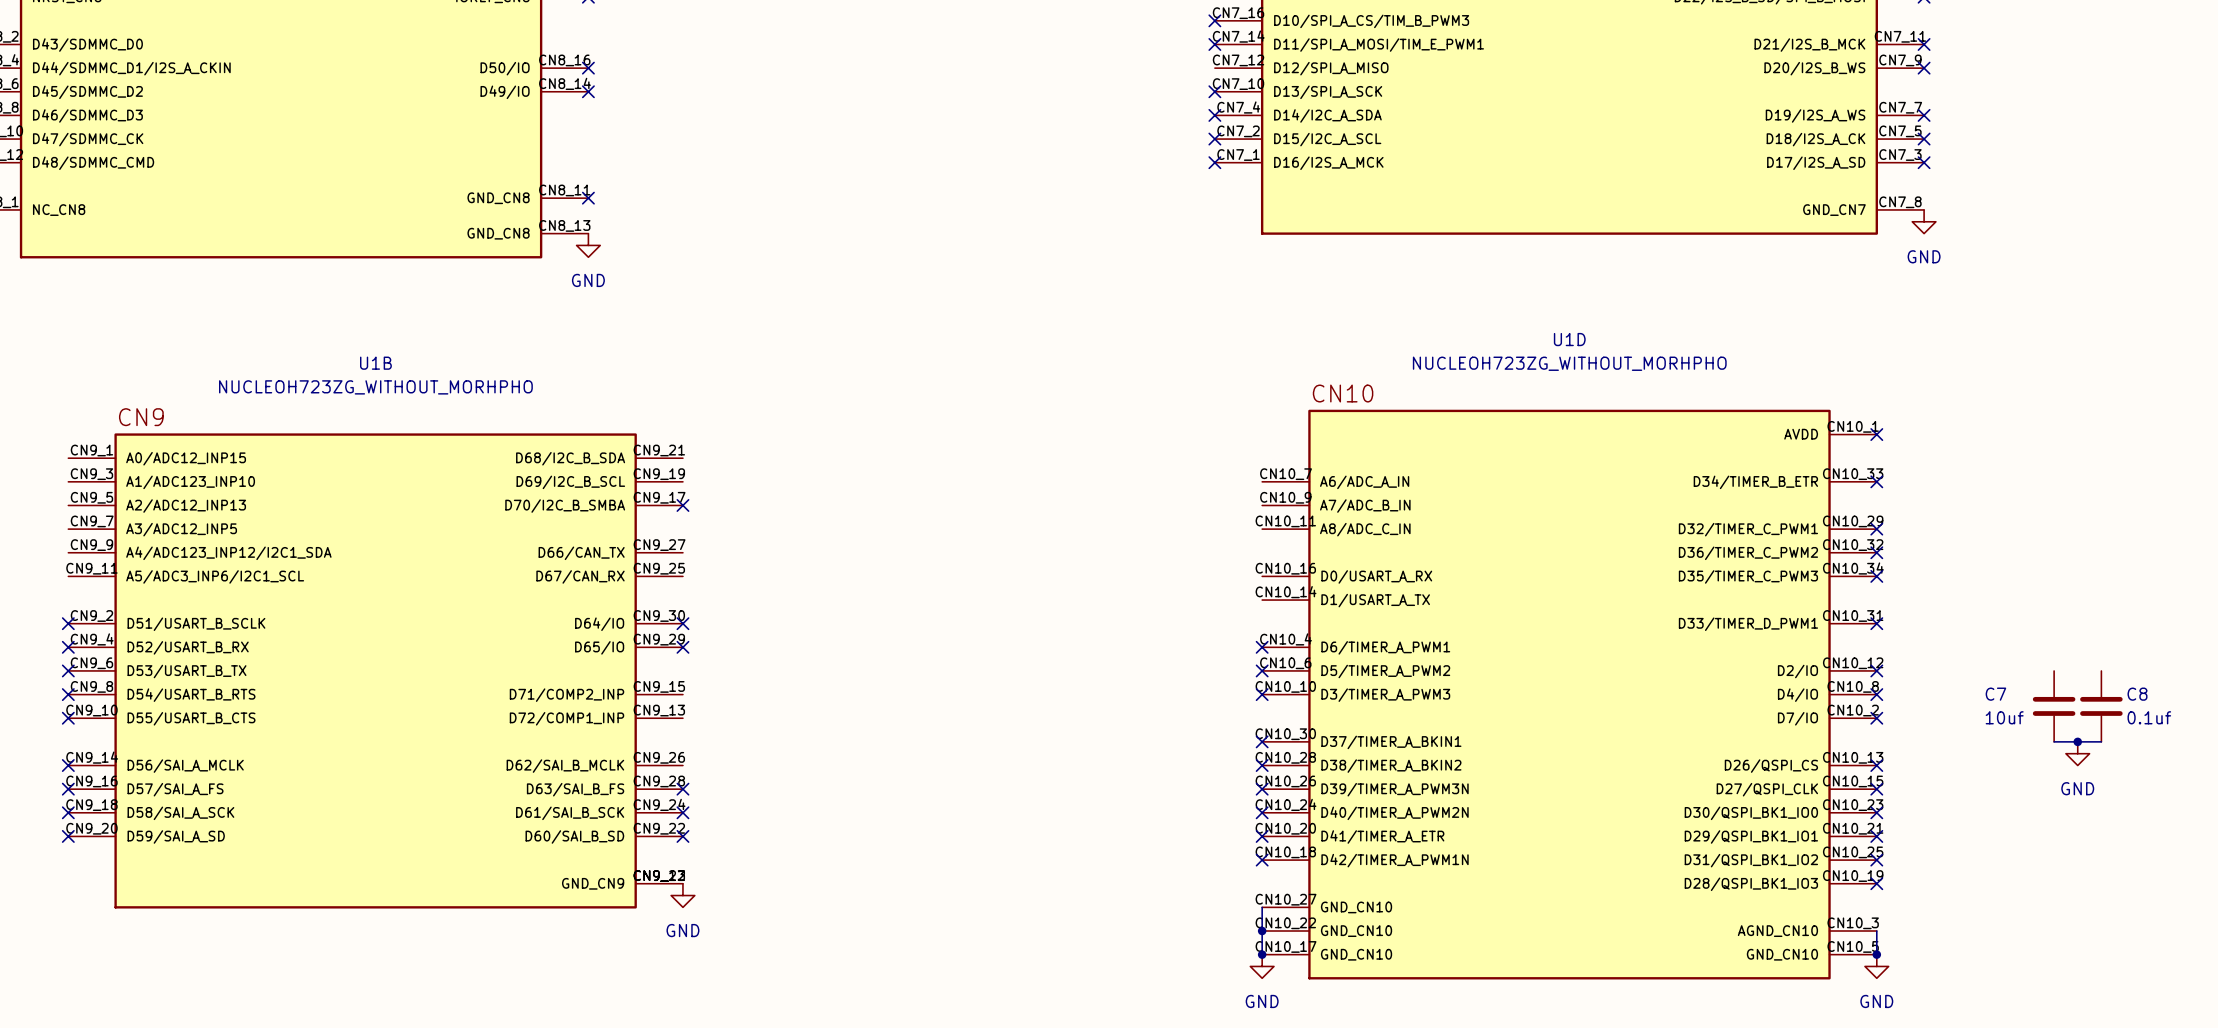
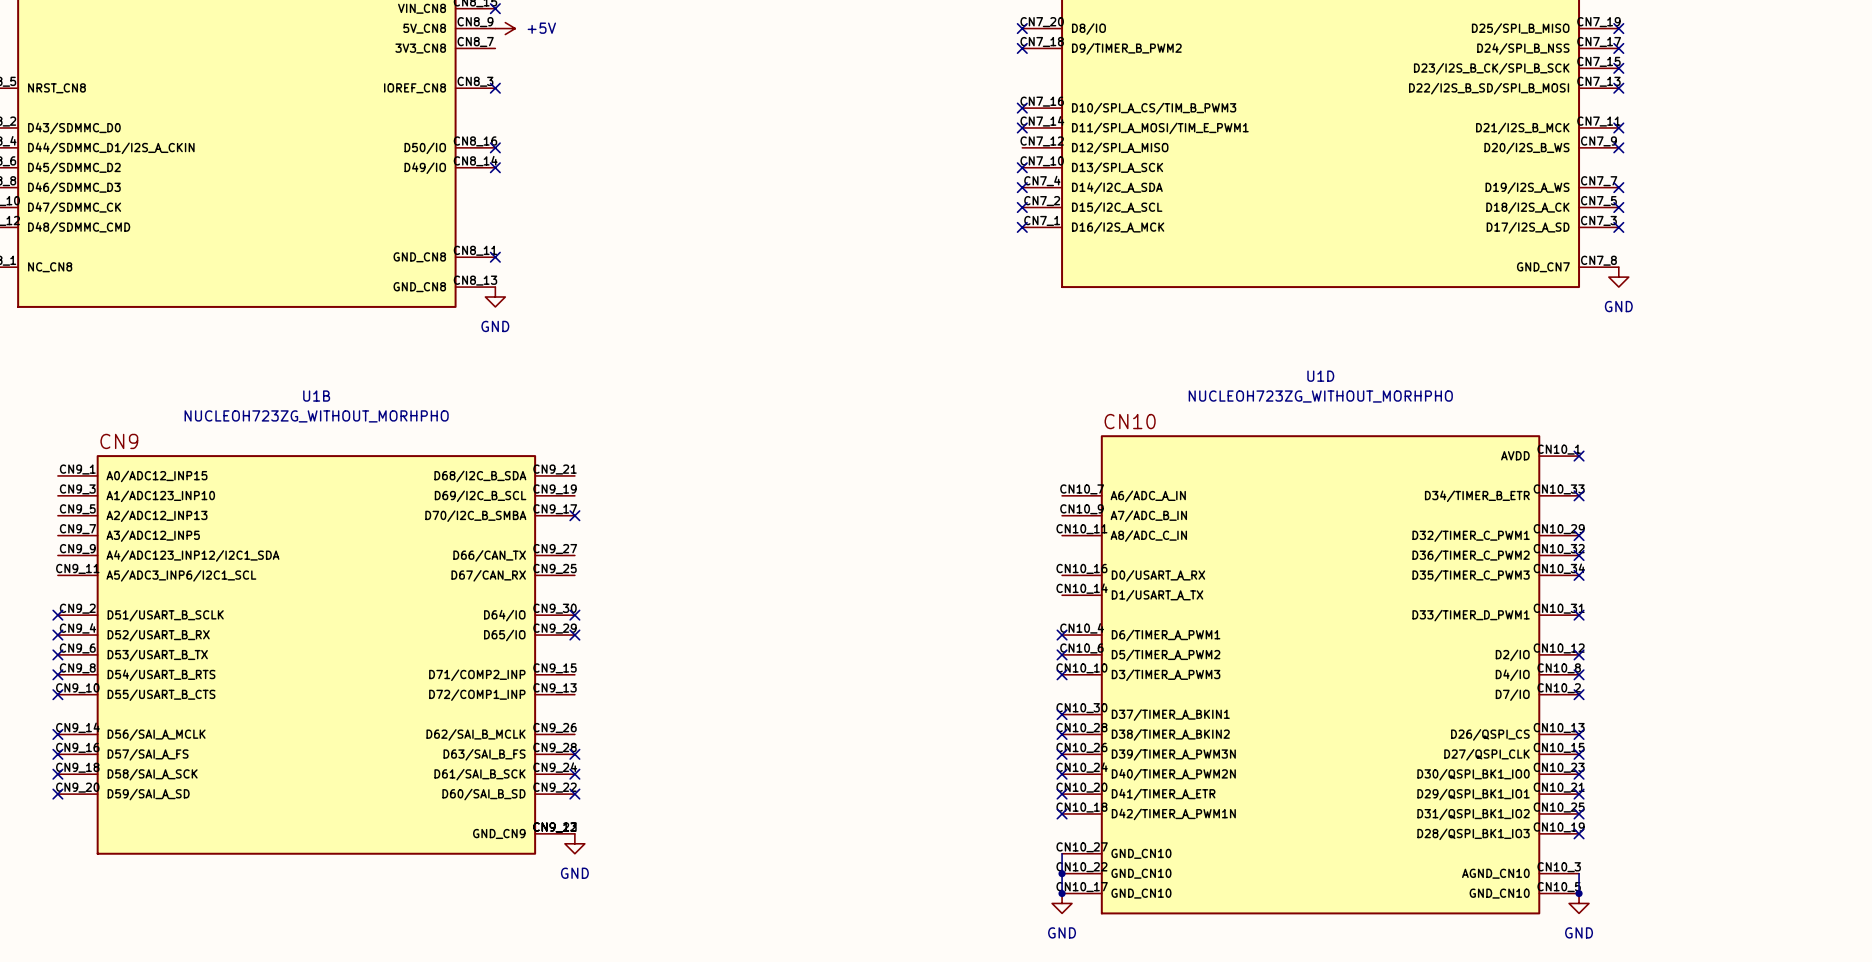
C7: 10uf (2054, 706) -> none
C8: 0.1uf (2101, 706) -> none
wire: (2054, 741) (2101, 741) -> none
junction: (2077, 741) -> none
power symbol: GND (2077, 753) -> none

